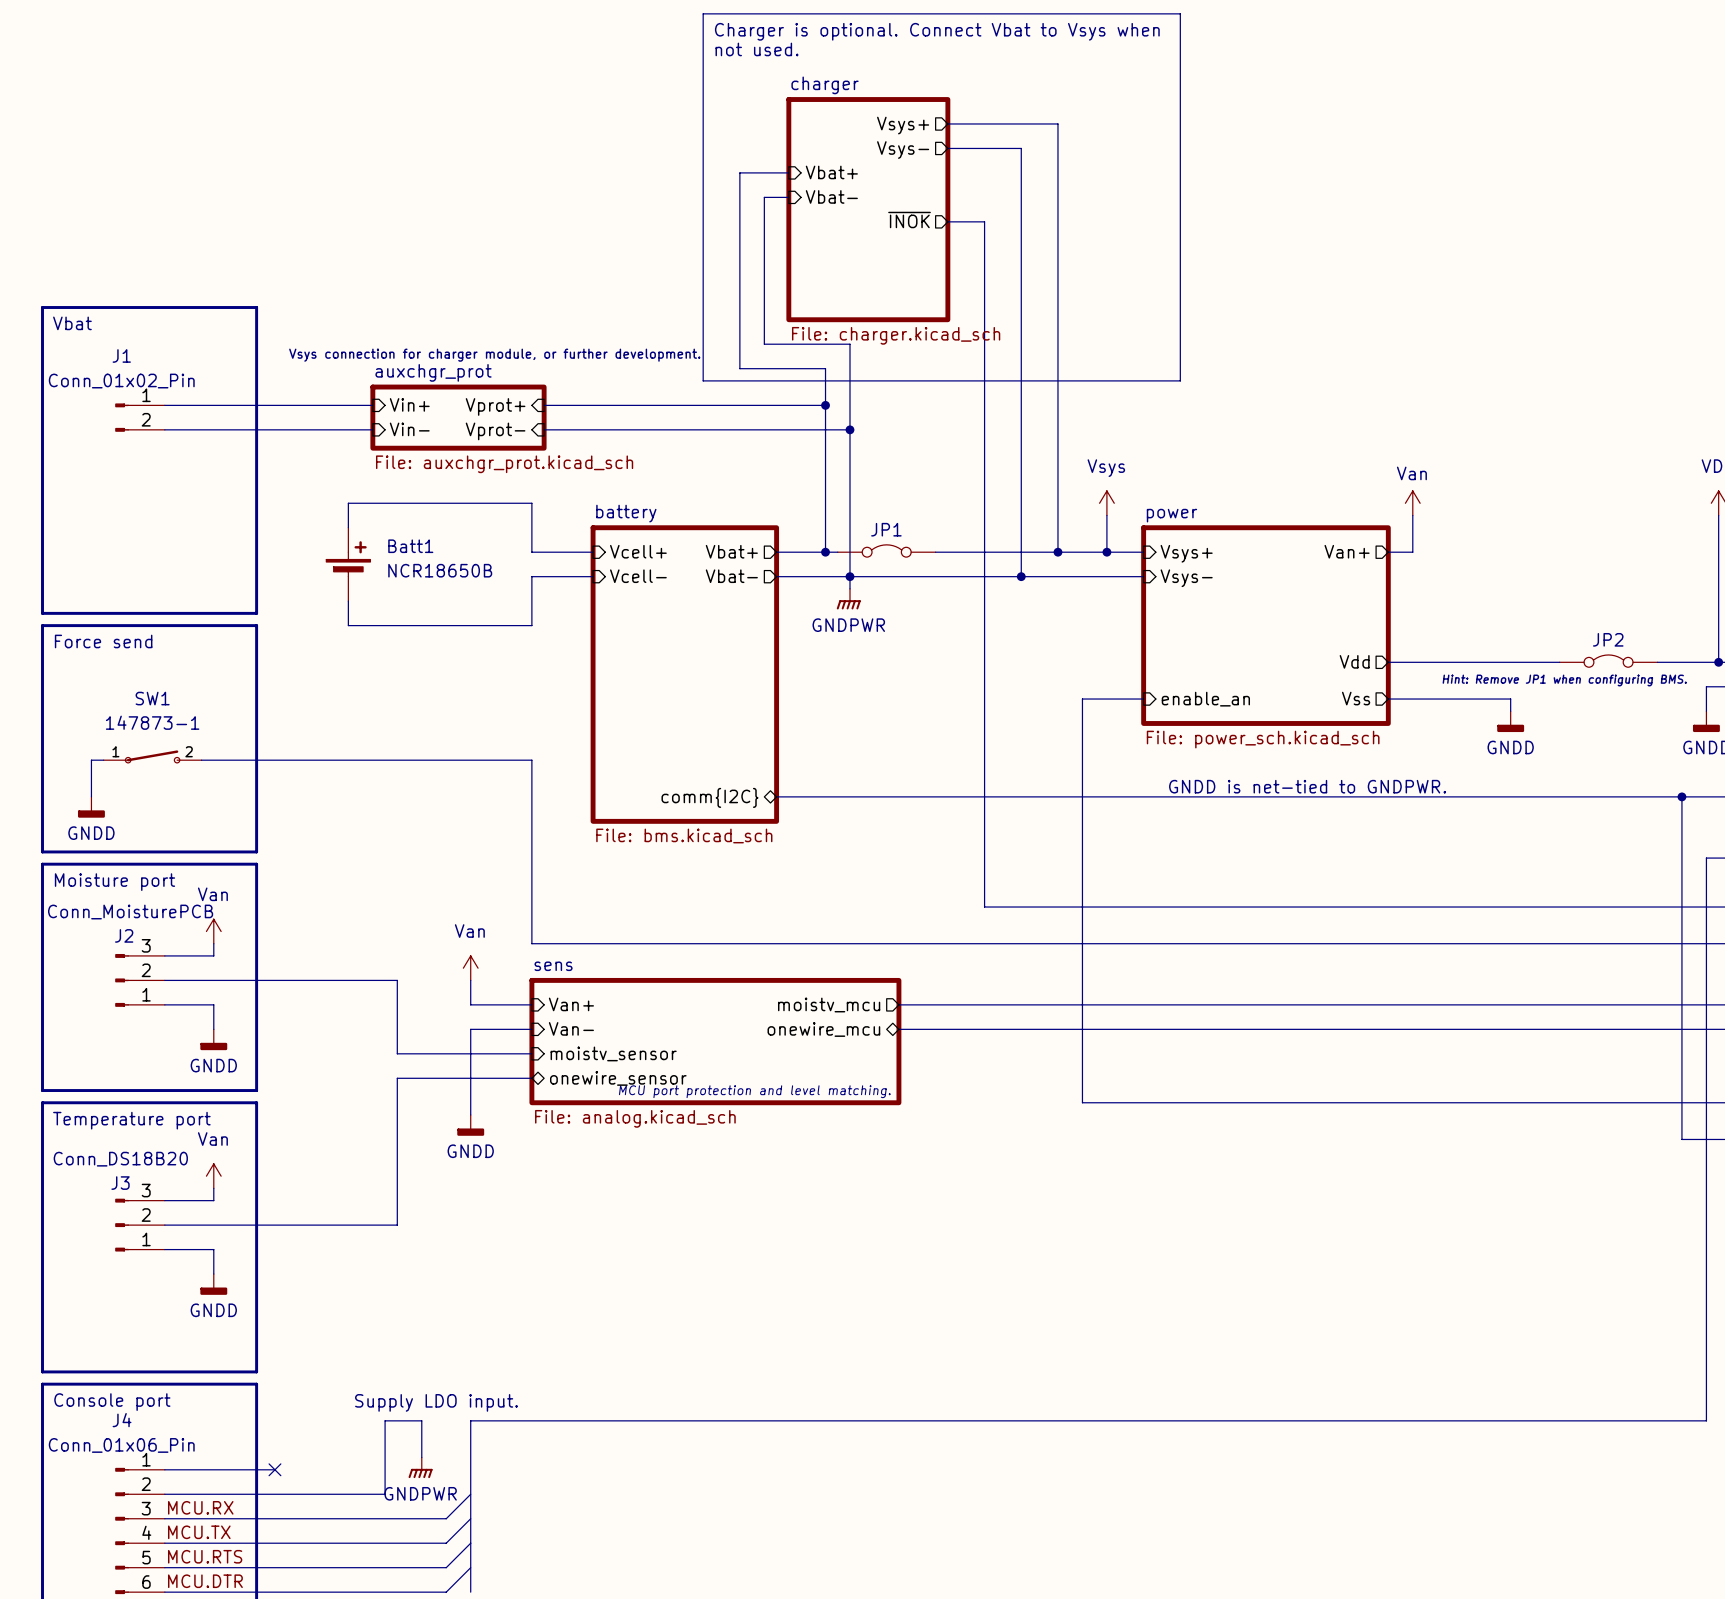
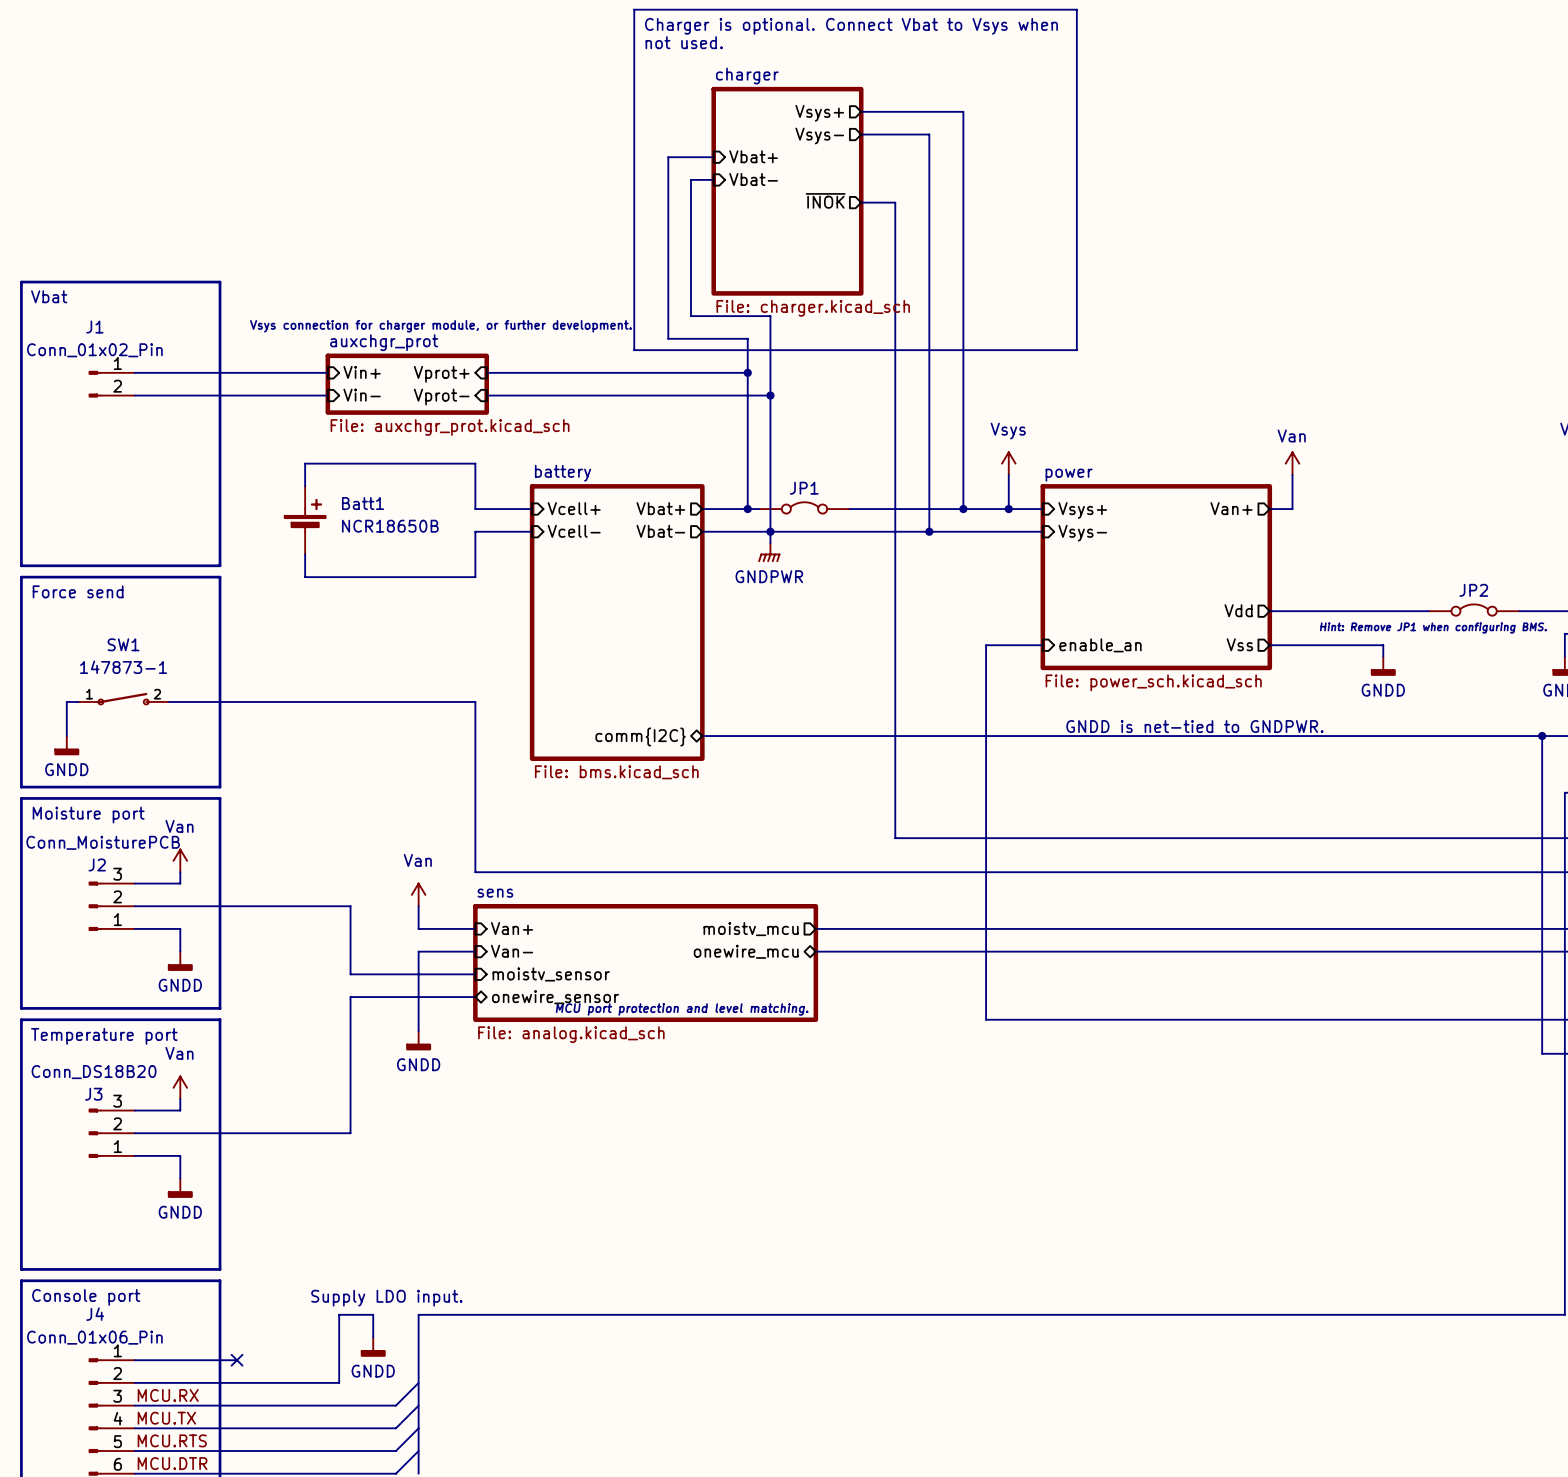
power symbol: none -> GNDD (373, 1347)
power symbol: GNDPWR (420, 1467) -> none

